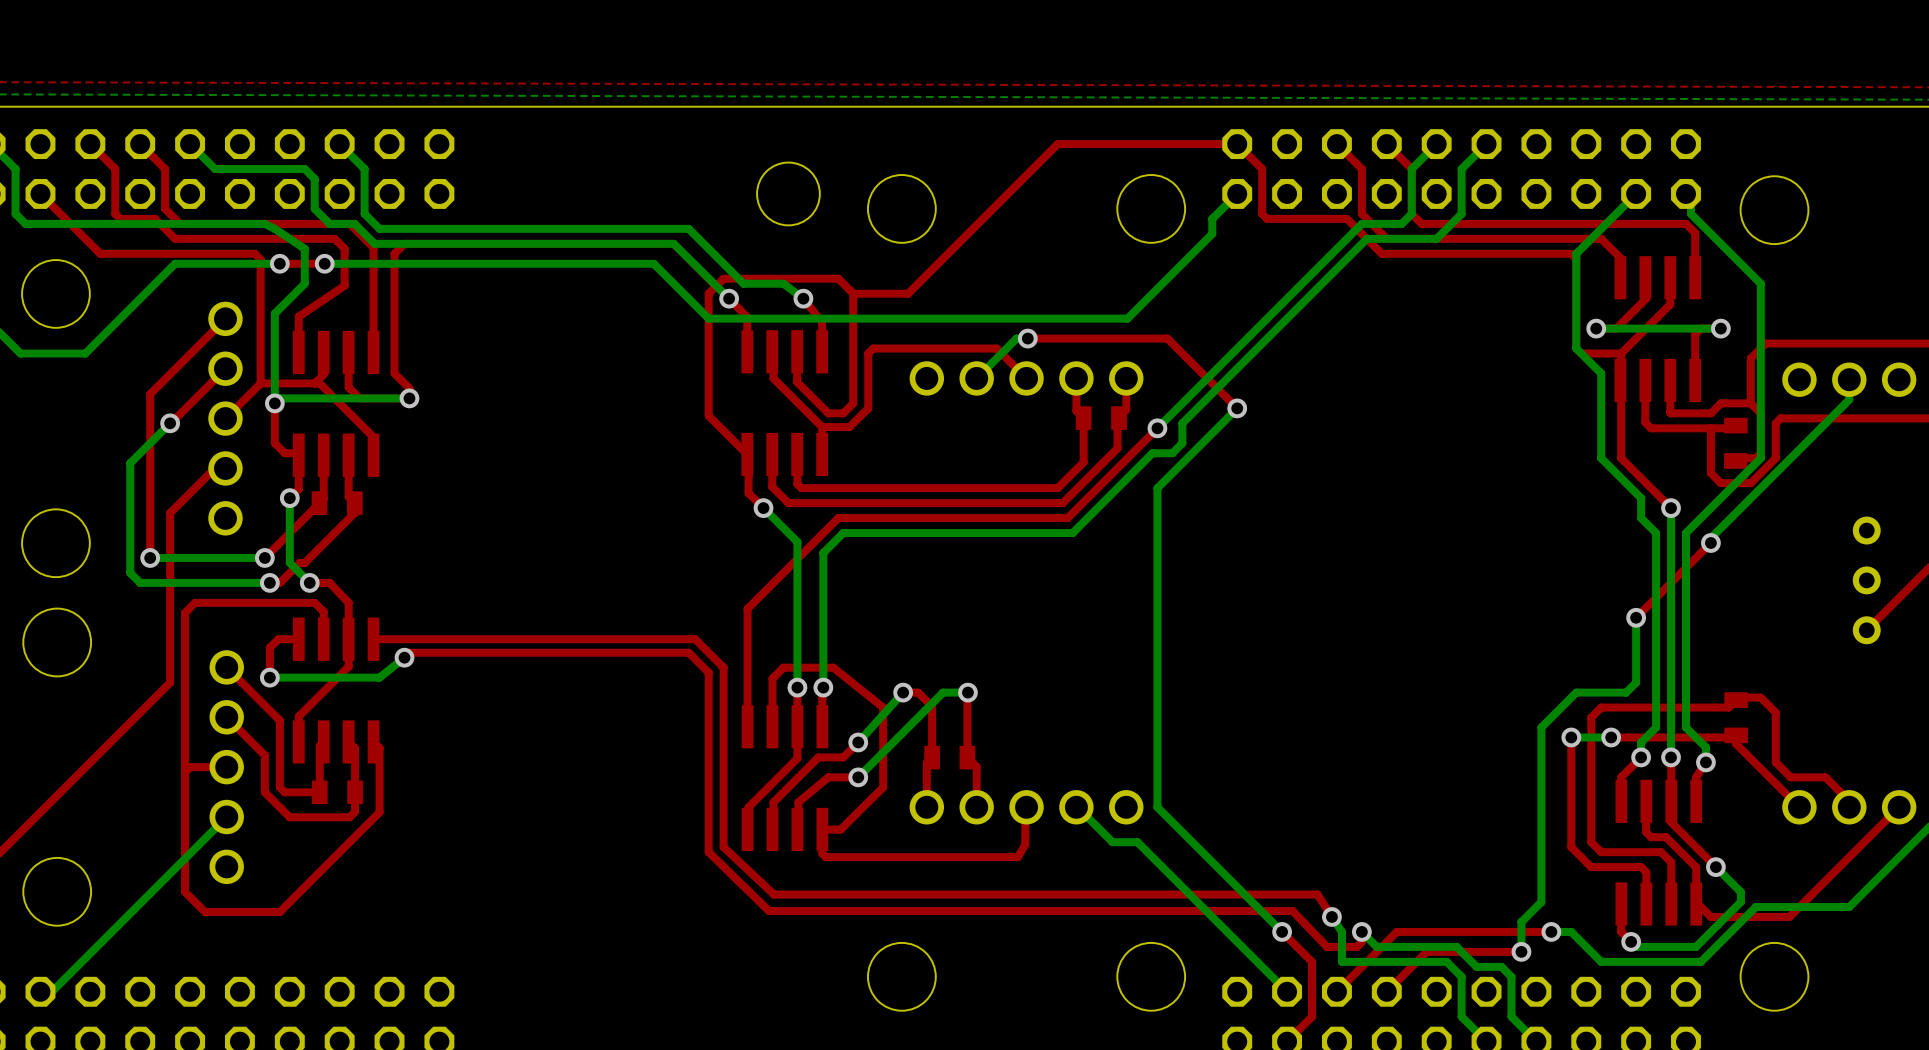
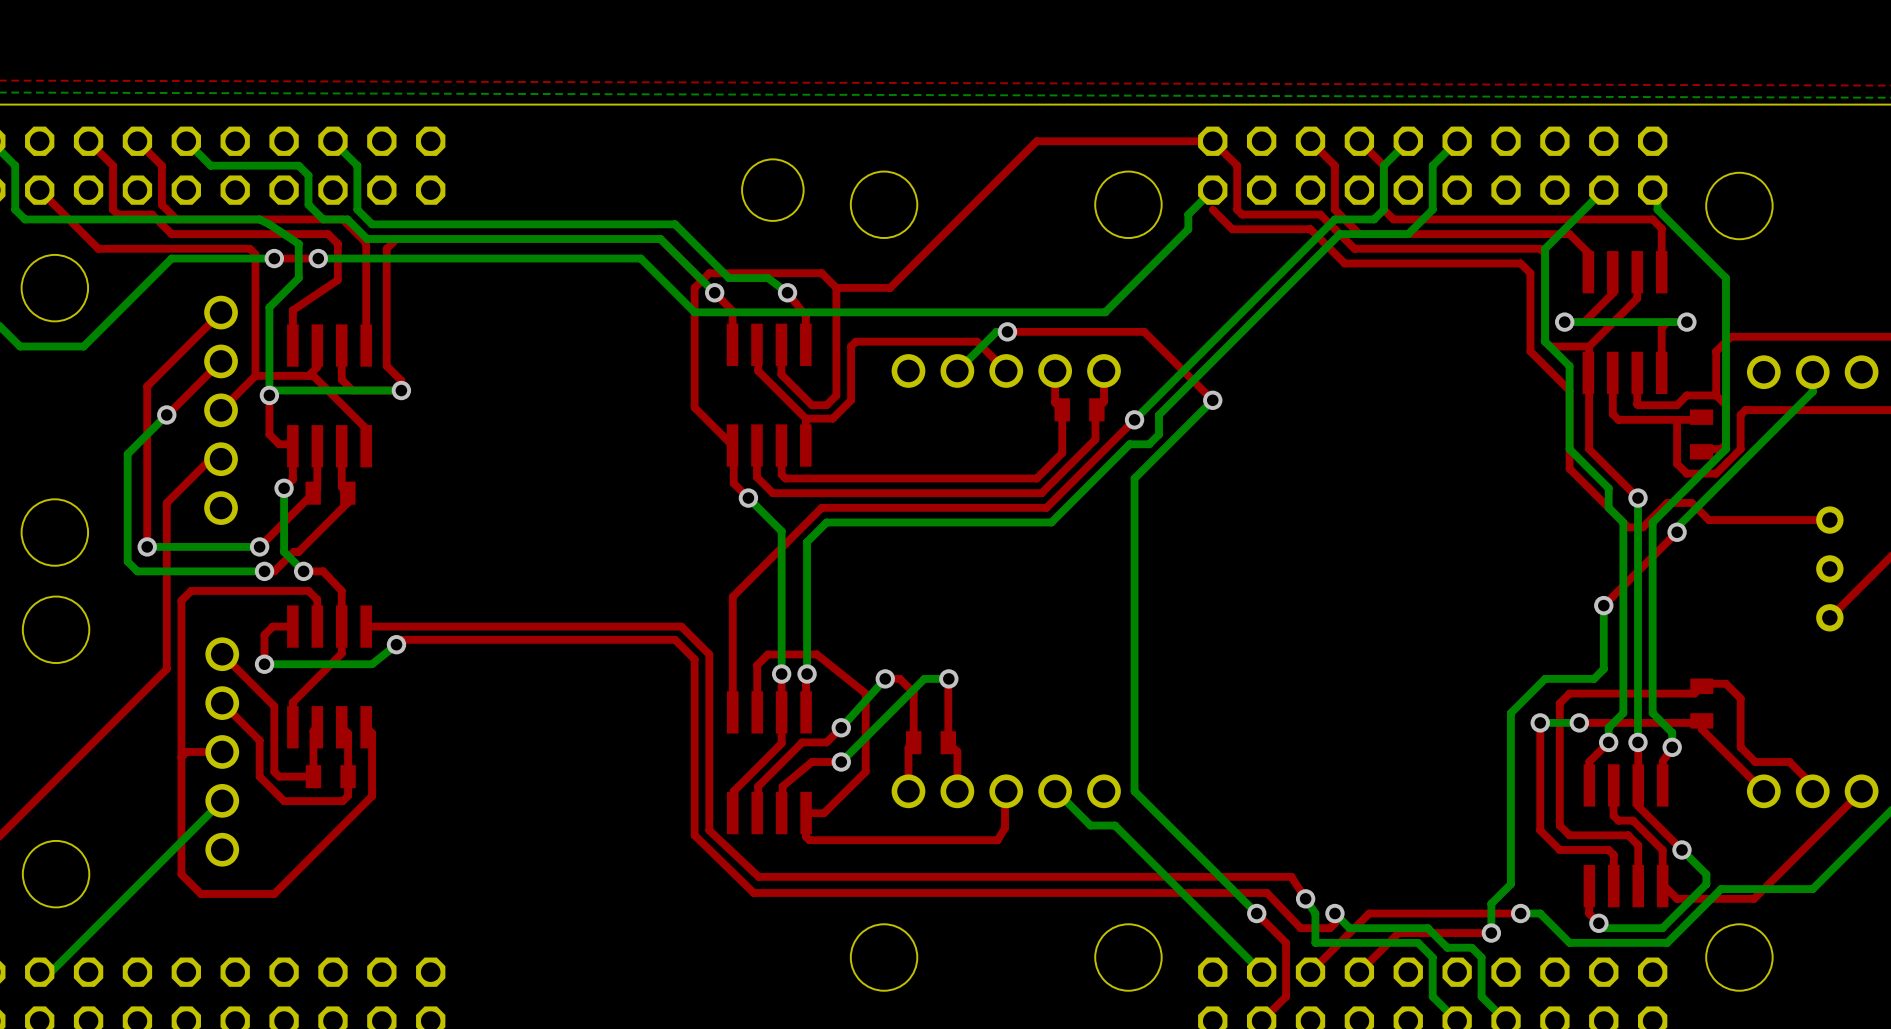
top track: none -> (1212, 209) (1232, 229) (1310, 229) (1344, 263) (1520, 263) (1530, 273) (1530, 351) (1569, 390) (1569, 468) (1628, 527) (1642, 527) (1667, 502) (1691, 502) (1708, 520) (1829, 520)

